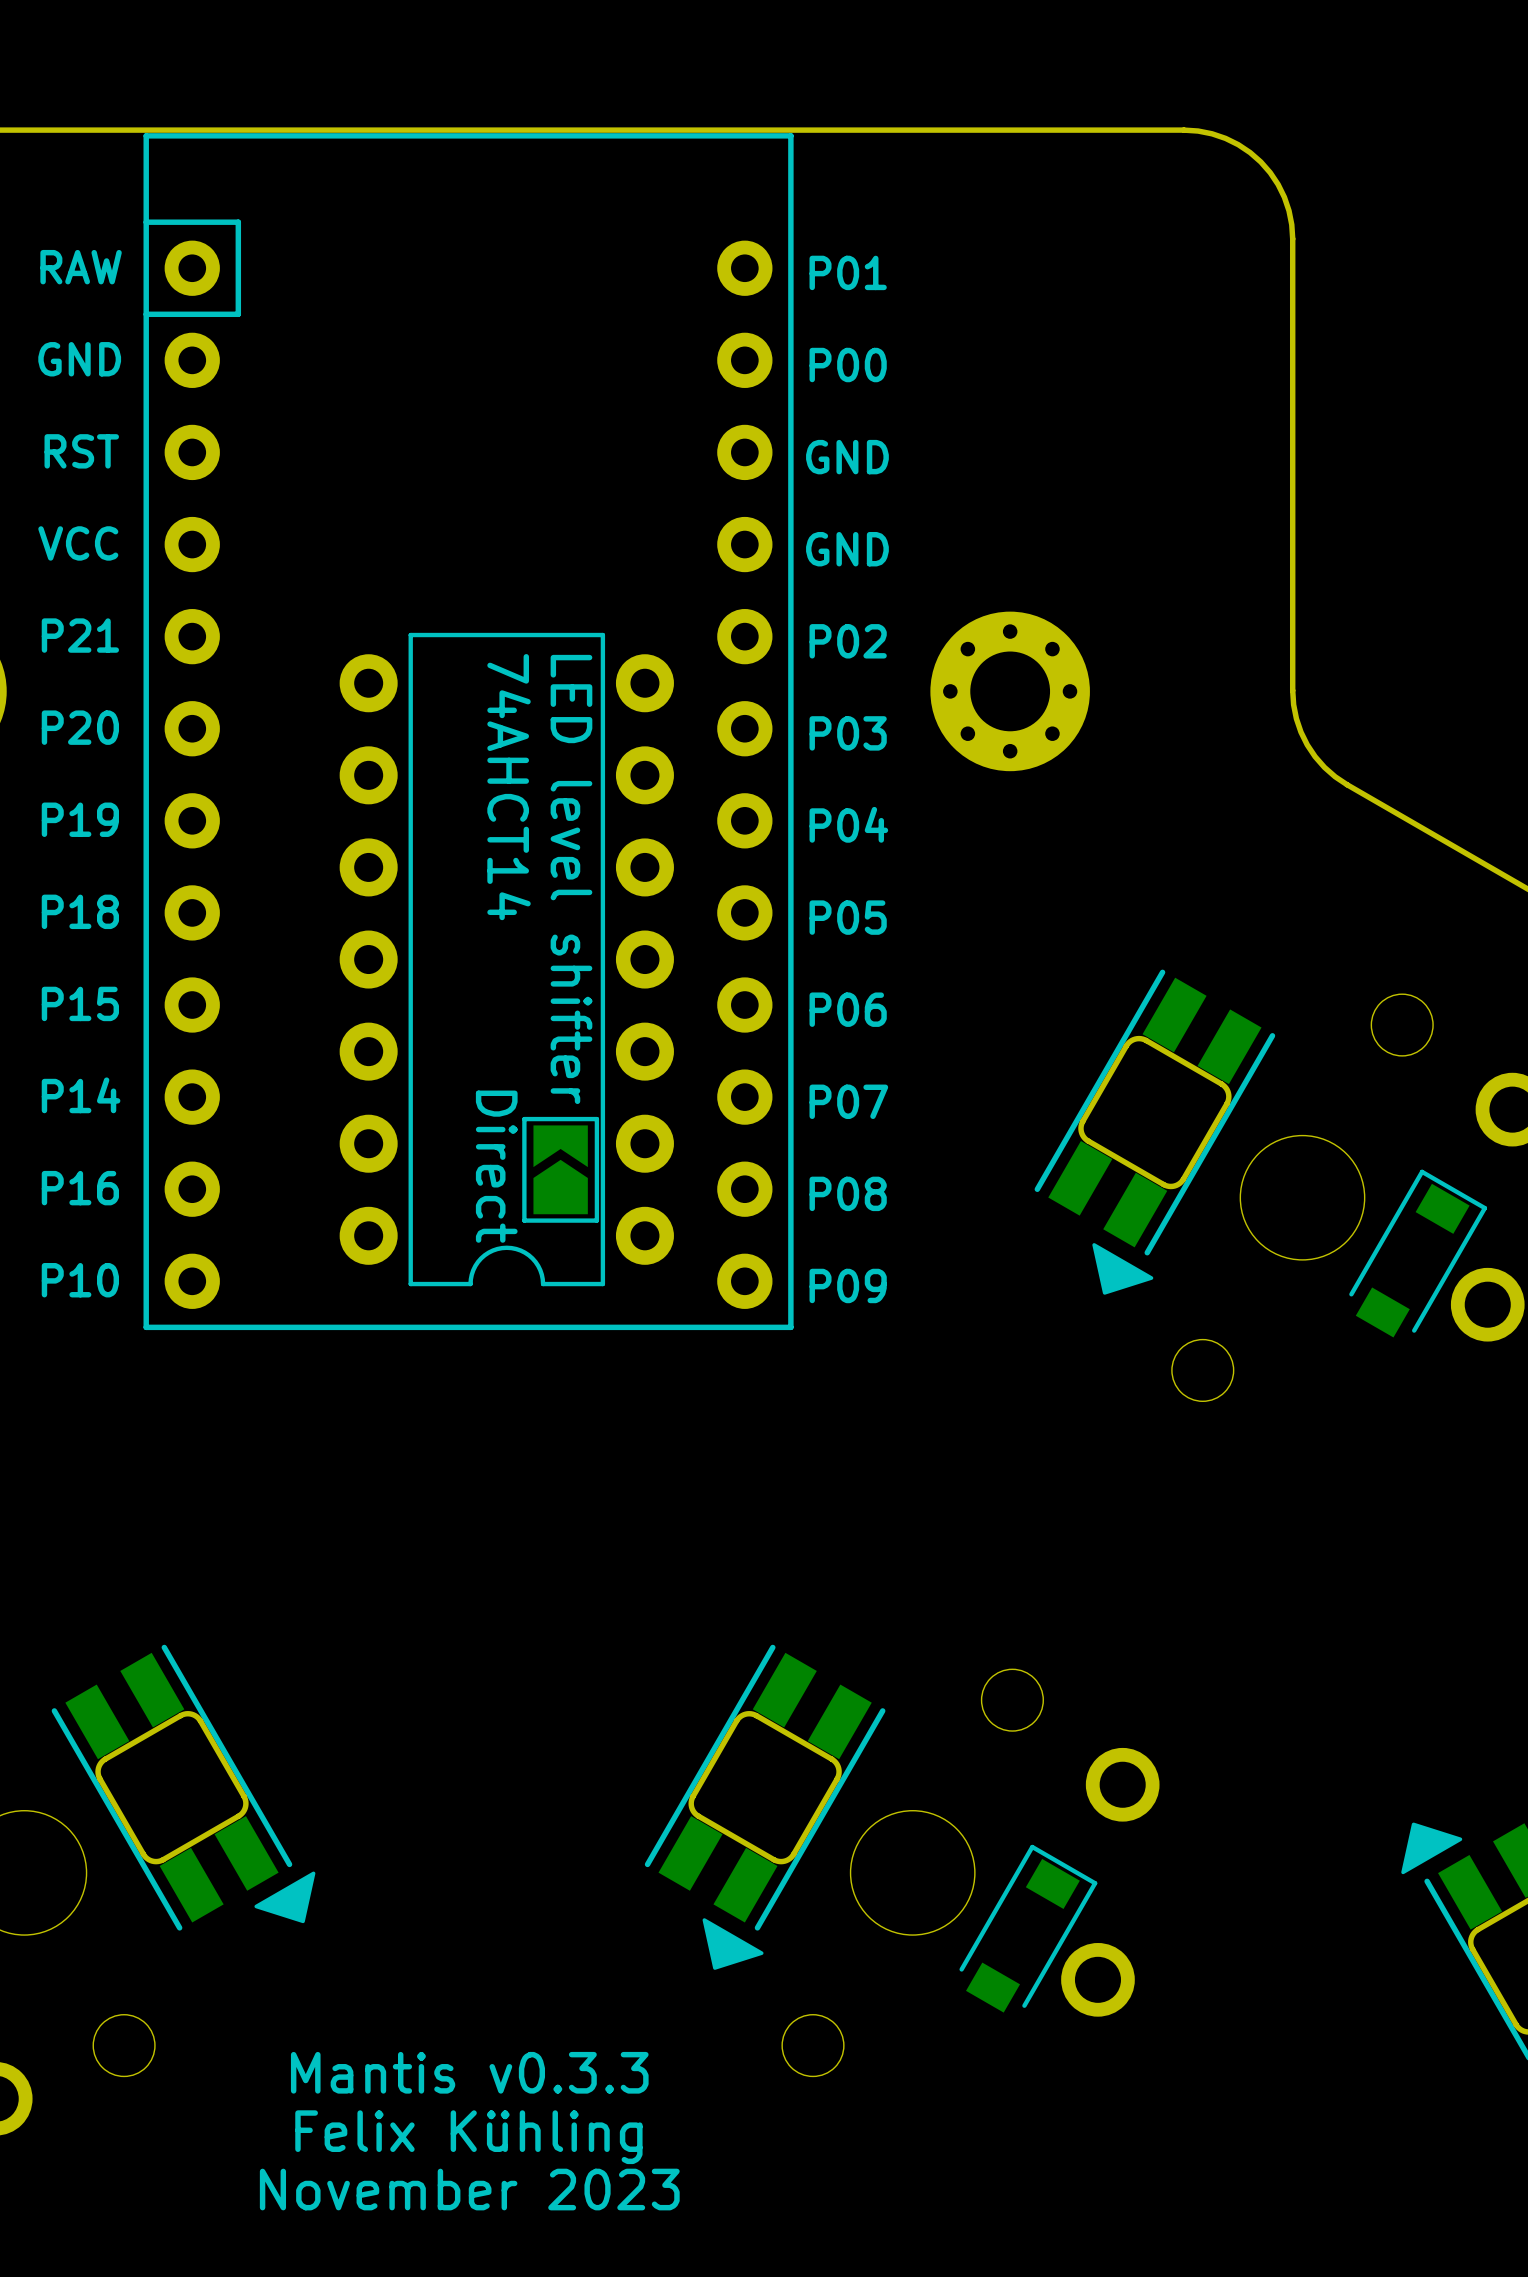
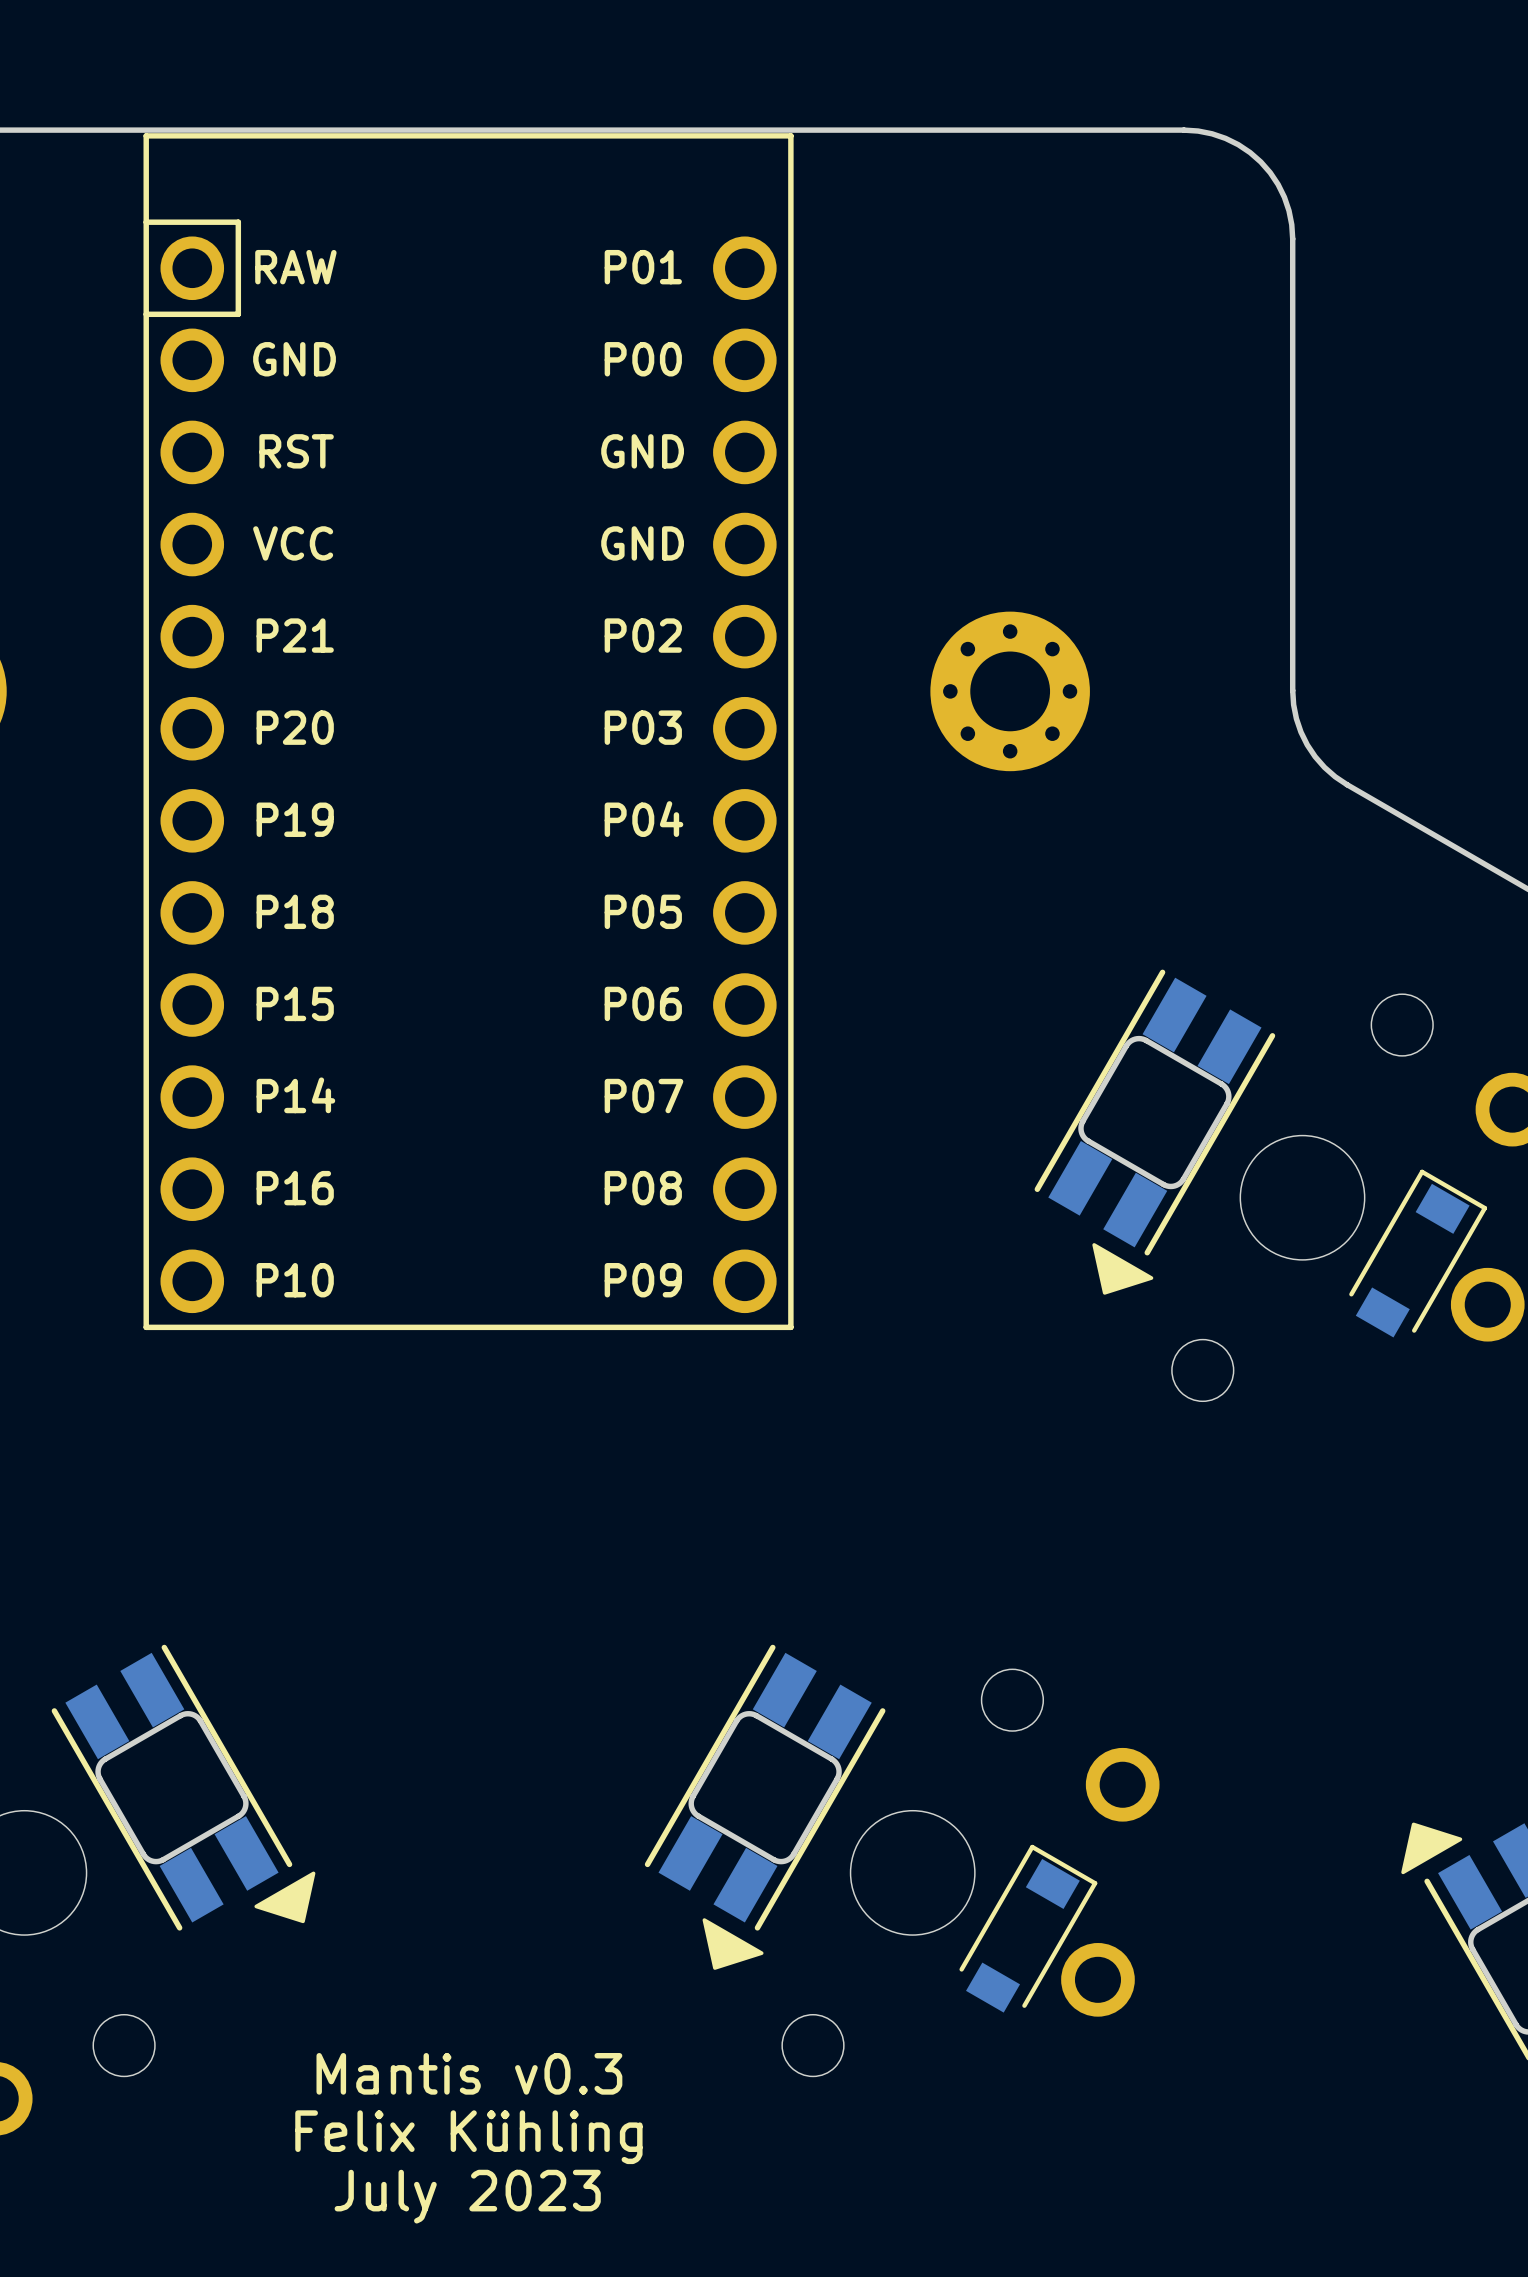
part footprint: [143, 133, 794, 1331] -> [143, 133, 794, 1331]
LED level shifter: (506, 959) -> none
Direct: (560, 1169) -> none
text: Mantis v0.3.3 (469, 2072) -> Mantis v0.3 (469, 2073)
text: November 2023 (469, 2189) -> July 2023 (467, 2196)

